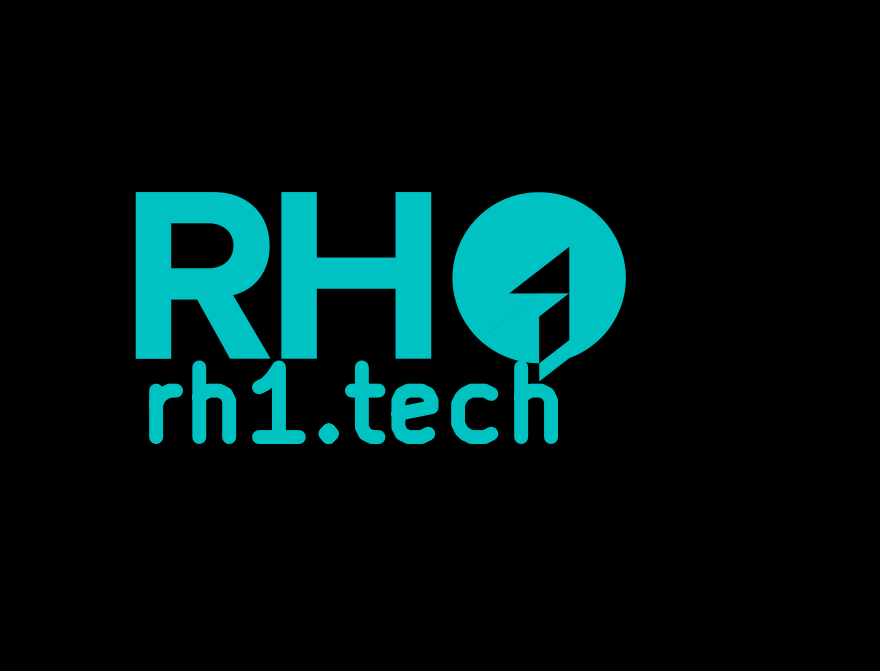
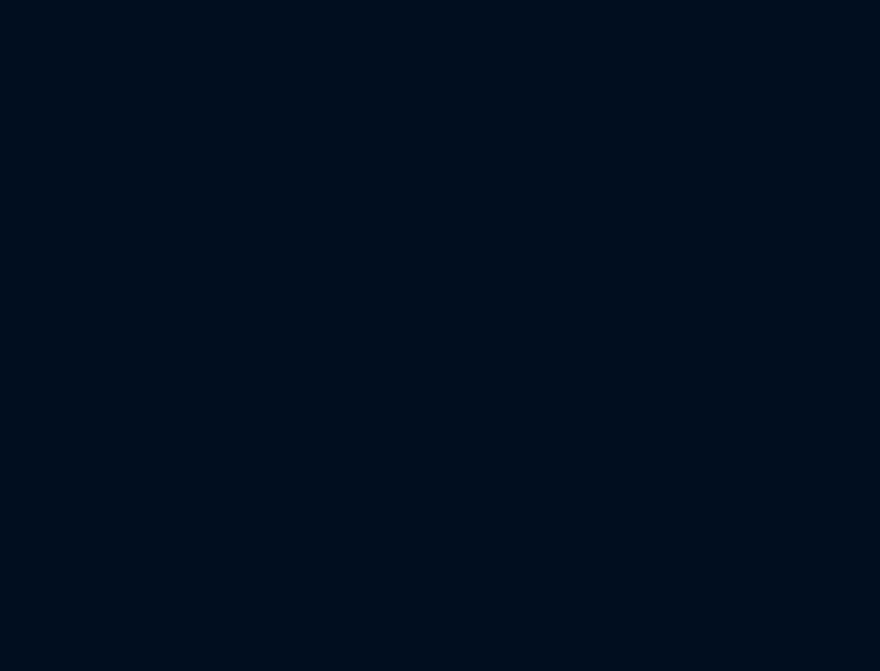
drawing: [135, 192, 626, 382] -> none
text: rh1.tech (353, 402) -> none

